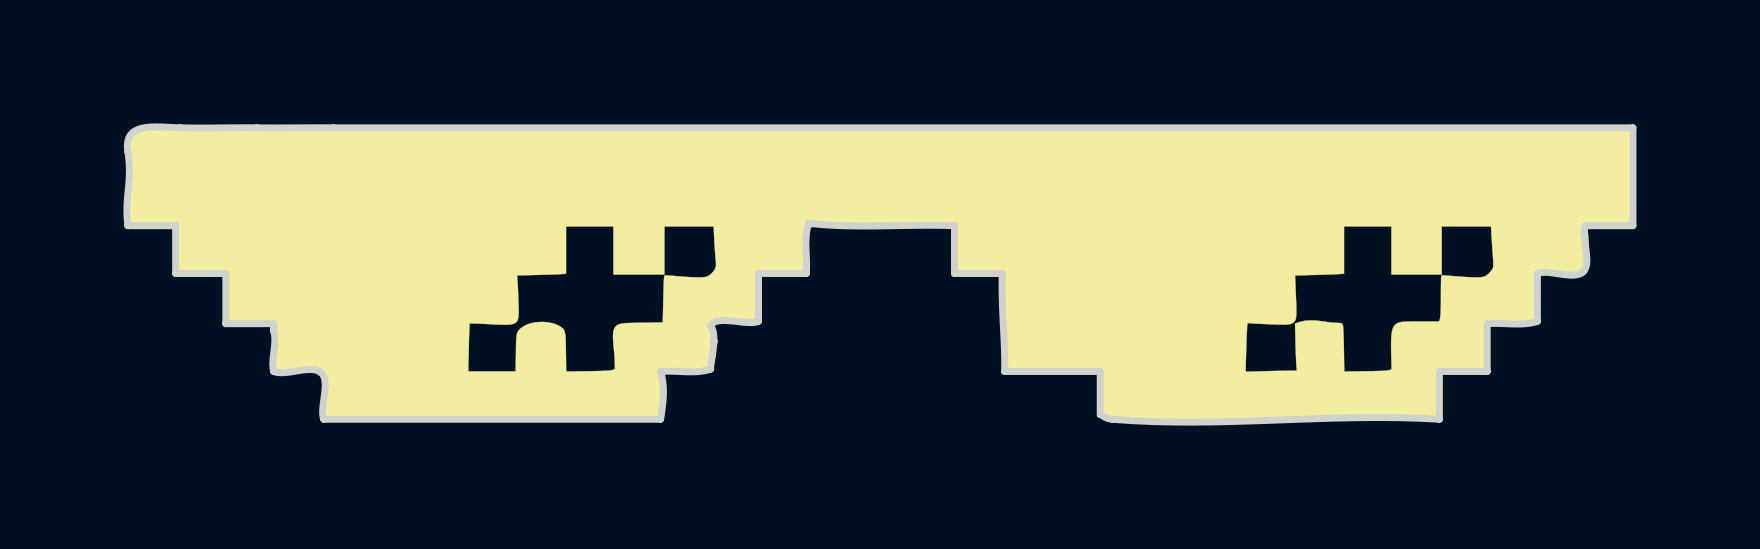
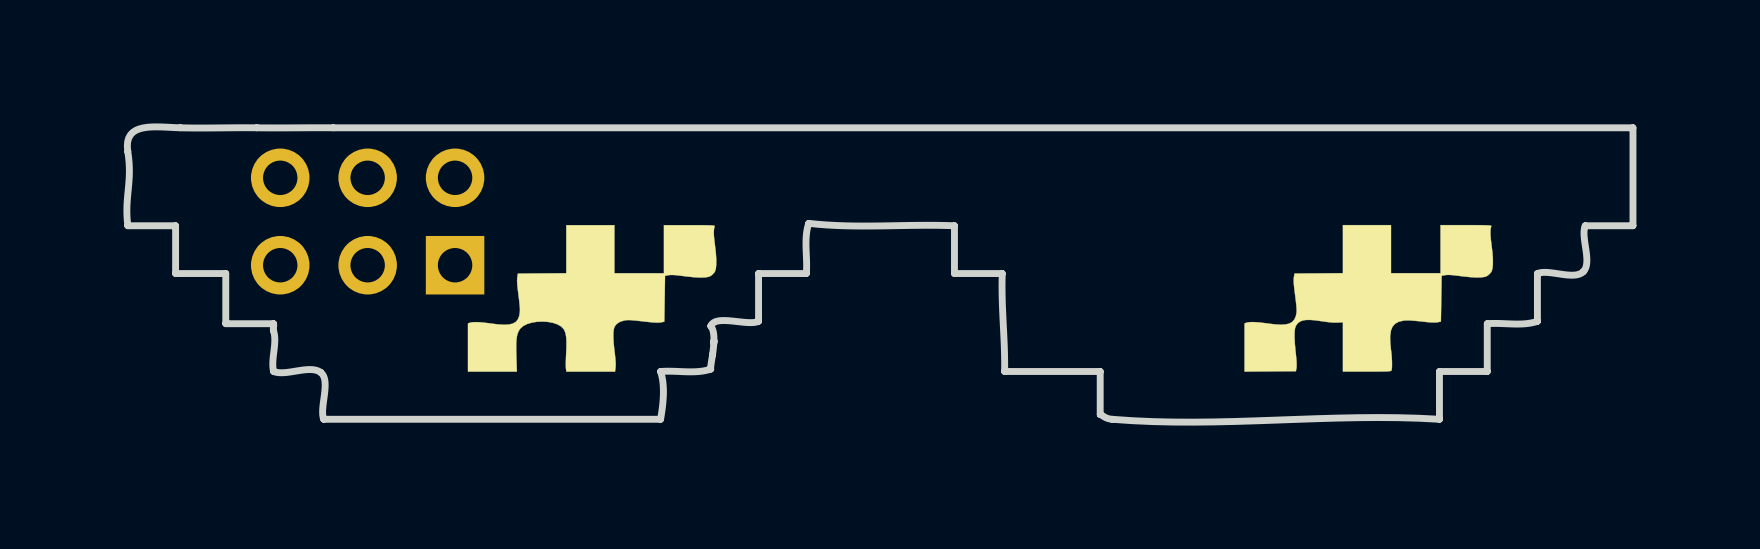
drawing: [127, 127, 1636, 422] -> none
drawing: none -> [467, 224, 1494, 372]

